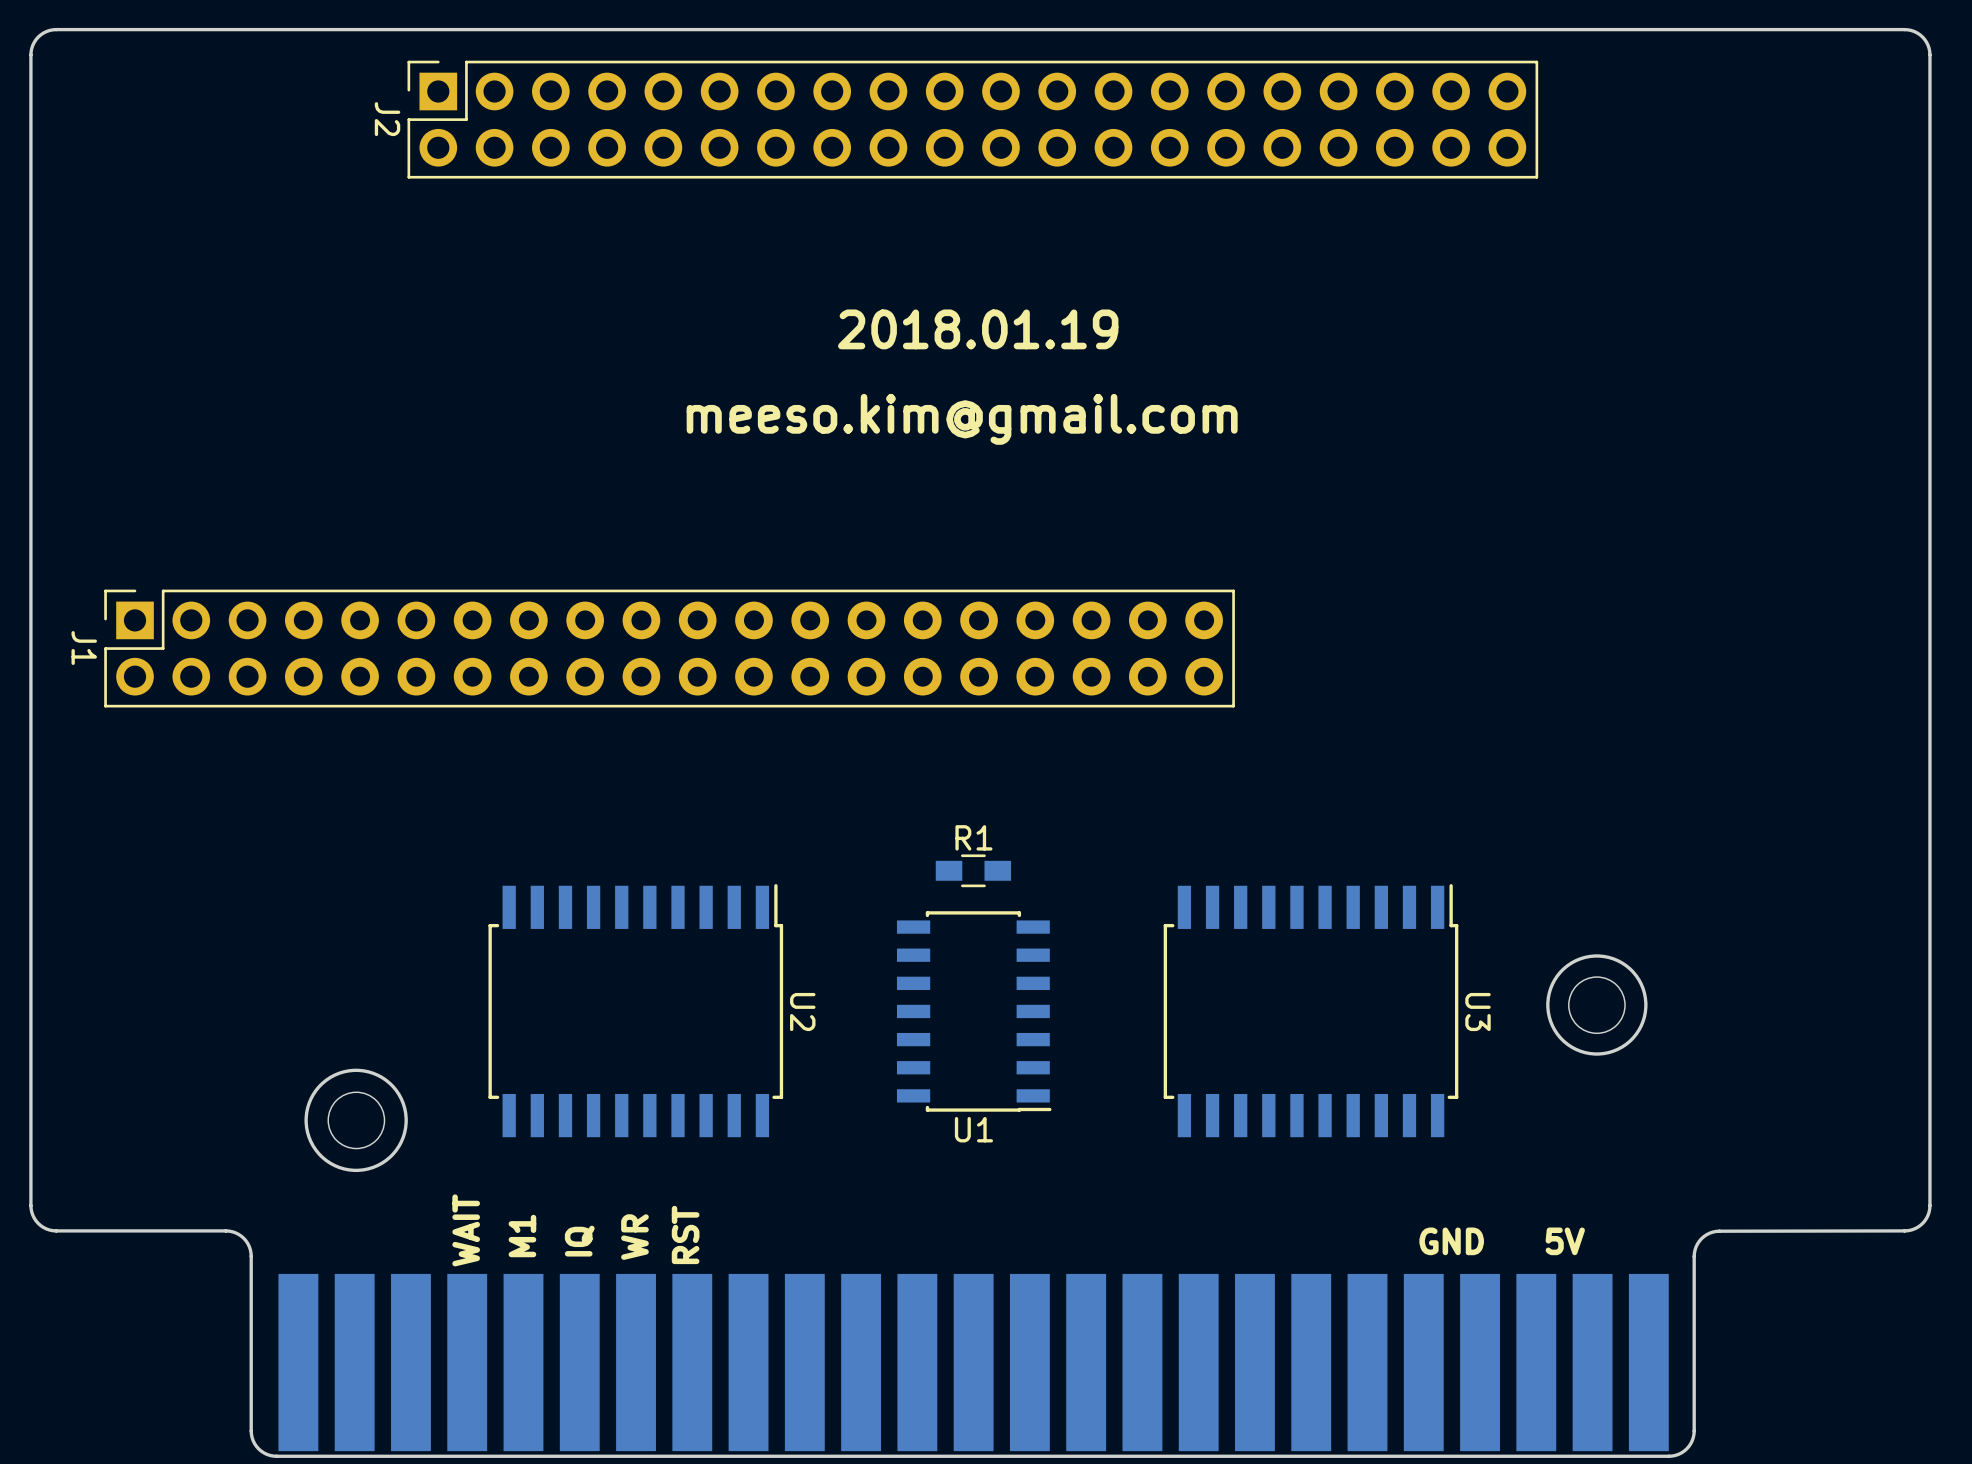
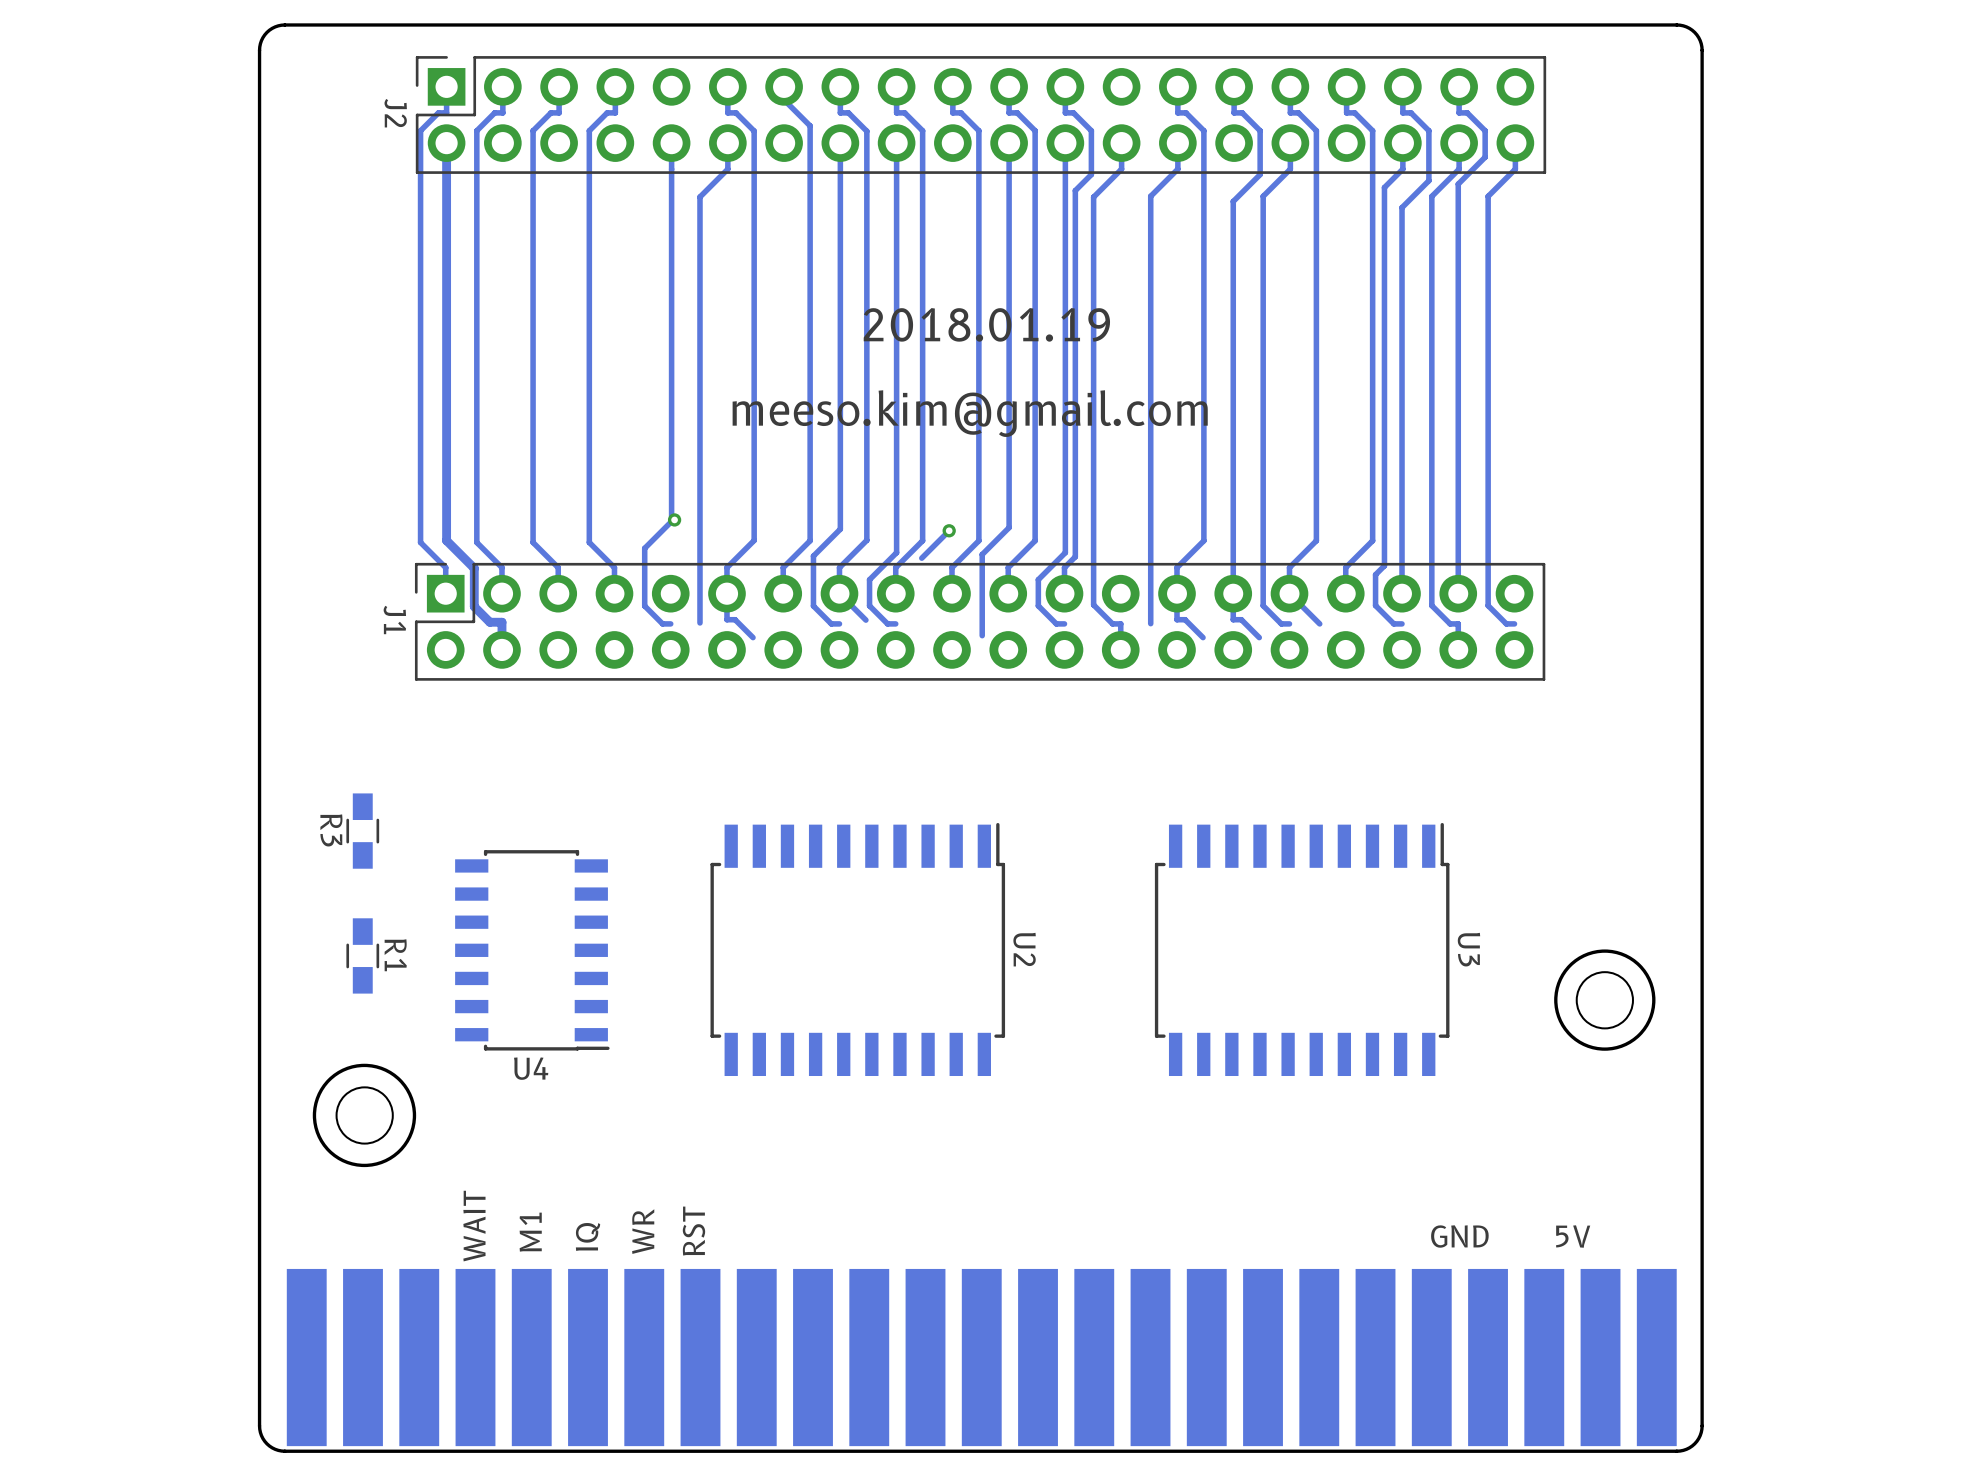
board edge: (276, 29) (52, 29) (38, 37) (32, 45) (30, 54) (31, 1208) (38, 1223) (52, 1230) (232, 1231) (245, 1240) (251, 1256) -> (284, 24) (275, 26) (266, 32) (261, 40) (259, 50) (259, 1251)
board edge: (1668, 29) (1907, 29) (1922, 37) (1928, 45) (1929, 54) (1929, 1208) (1922, 1223) (1907, 1230) (1712, 1232) (1699, 1241) (1694, 1256) -> (1676, 24) (1686, 26) (1694, 32) (1700, 40) (1702, 50) (1702, 1251)
track: none -> (446, 86) (446, 112) (438, 112) (420, 130) (420, 542) (445, 567) (445, 593)
track: none -> (502, 86) (502, 112) (494, 112) (476, 130) (476, 542) (501, 567) (501, 593)
track: none -> (559, 86) (559, 112) (550, 112) (533, 130) (533, 542) (558, 567) (558, 593)
track: none -> (615, 86) (615, 112) (607, 112) (589, 130) (589, 542) (614, 567) (614, 593)
track: none -> (727, 86) (727, 112) (735, 112) (754, 131) (754, 540) (726, 567) (726, 619) (735, 619) (753, 637)
track: none -> (784, 86) (784, 99) (810, 125) (810, 540) (783, 567) (783, 593)
track: none -> (840, 86) (840, 112) (848, 112) (866, 131) (866, 540) (839, 567) (839, 593) (865, 620)
track: none -> (896, 86) (896, 112) (904, 112) (922, 130) (922, 540) (895, 567) (895, 593)
track: none -> (952, 86) (952, 112) (960, 112) (978, 130) (978, 540) (951, 567) (951, 593)
track: none -> (1009, 86) (1009, 112) (1017, 112) (1035, 130) (1035, 540) (1008, 567) (1008, 593)
track: none -> (1065, 86) (1065, 112) (1073, 112) (1091, 130) (1091, 174) (1075, 190) (1075, 556) (1064, 567) (1064, 593)
track: none -> (1177, 86) (1177, 112) (1186, 112) (1203, 130) (1203, 540) (1177, 567) (1177, 619) (1185, 619) (1203, 637)
track: none -> (1234, 86) (1234, 112) (1242, 112) (1260, 130) (1260, 174) (1233, 201) (1233, 619) (1241, 619) (1259, 637)
track: none -> (1290, 86) (1290, 112) (1298, 112) (1316, 130) (1316, 540) (1289, 567) (1289, 593) (1319, 623)
track: none -> (1346, 86) (1346, 112) (1354, 112) (1372, 130) (1372, 540) (1345, 567) (1345, 593)
track: none -> (1402, 86) (1402, 112) (1411, 112) (1428, 130) (1428, 180) (1402, 207) (1402, 593)
track: none -> (1459, 86) (1459, 112) (1467, 112) (1485, 130) (1485, 157) (1458, 184) (1458, 593)
track: none -> (446, 143) (446, 540) (474, 568) (474, 606) (489, 622) (501, 622) (501, 636)
track: none -> (671, 143) (673, 519)
track: none -> (727, 143) (727, 169) (699, 197) (699, 622)
track: none -> (840, 143) (840, 529) (813, 556) (813, 606) (831, 623) (839, 623)
track: none -> (896, 143) (896, 552) (869, 579) (869, 605) (887, 623) (895, 623)
track: none -> (1009, 143) (1009, 527) (982, 554) (982, 635)
track: none -> (1065, 143) (1065, 552) (1038, 579) (1038, 605) (1056, 623) (1064, 623)
track: none -> (1121, 143) (1121, 169) (1093, 197) (1093, 604) (1112, 623) (1120, 623) (1120, 636)
track: none -> (1177, 143) (1177, 169) (1150, 196) (1150, 623)
track: none -> (1290, 143) (1290, 169) (1263, 196) (1263, 605) (1281, 623) (1289, 623)
track: none -> (1402, 143) (1402, 169) (1384, 187) (1384, 565) (1375, 574) (1375, 605) (1393, 623) (1402, 623)
track: none -> (1459, 143) (1459, 169) (1431, 196) (1431, 605) (1450, 623) (1458, 623) (1458, 636)
track: none -> (1515, 143) (1515, 169) (1488, 196) (1488, 605) (1506, 623) (1514, 623)
track: none -> (673, 519) (644, 548) (644, 606) (662, 623) (670, 623)
via: none -> (674, 519)
track: none -> (949, 530) (921, 558)
via: none -> (949, 530)
J1 position: (669, 648) -> (980, 621)
R3: none -> (362, 831)
R1 rotation: 0° (973, 870) -> 90° clockwise (362, 955)
R1 position: (973, 870) -> (362, 955)
U4: none -> (532, 950)
U2 position: (635, 1010) -> (857, 949)
U3 position: (1311, 1010) -> (1302, 949)
U1: (974, 1011) -> none

